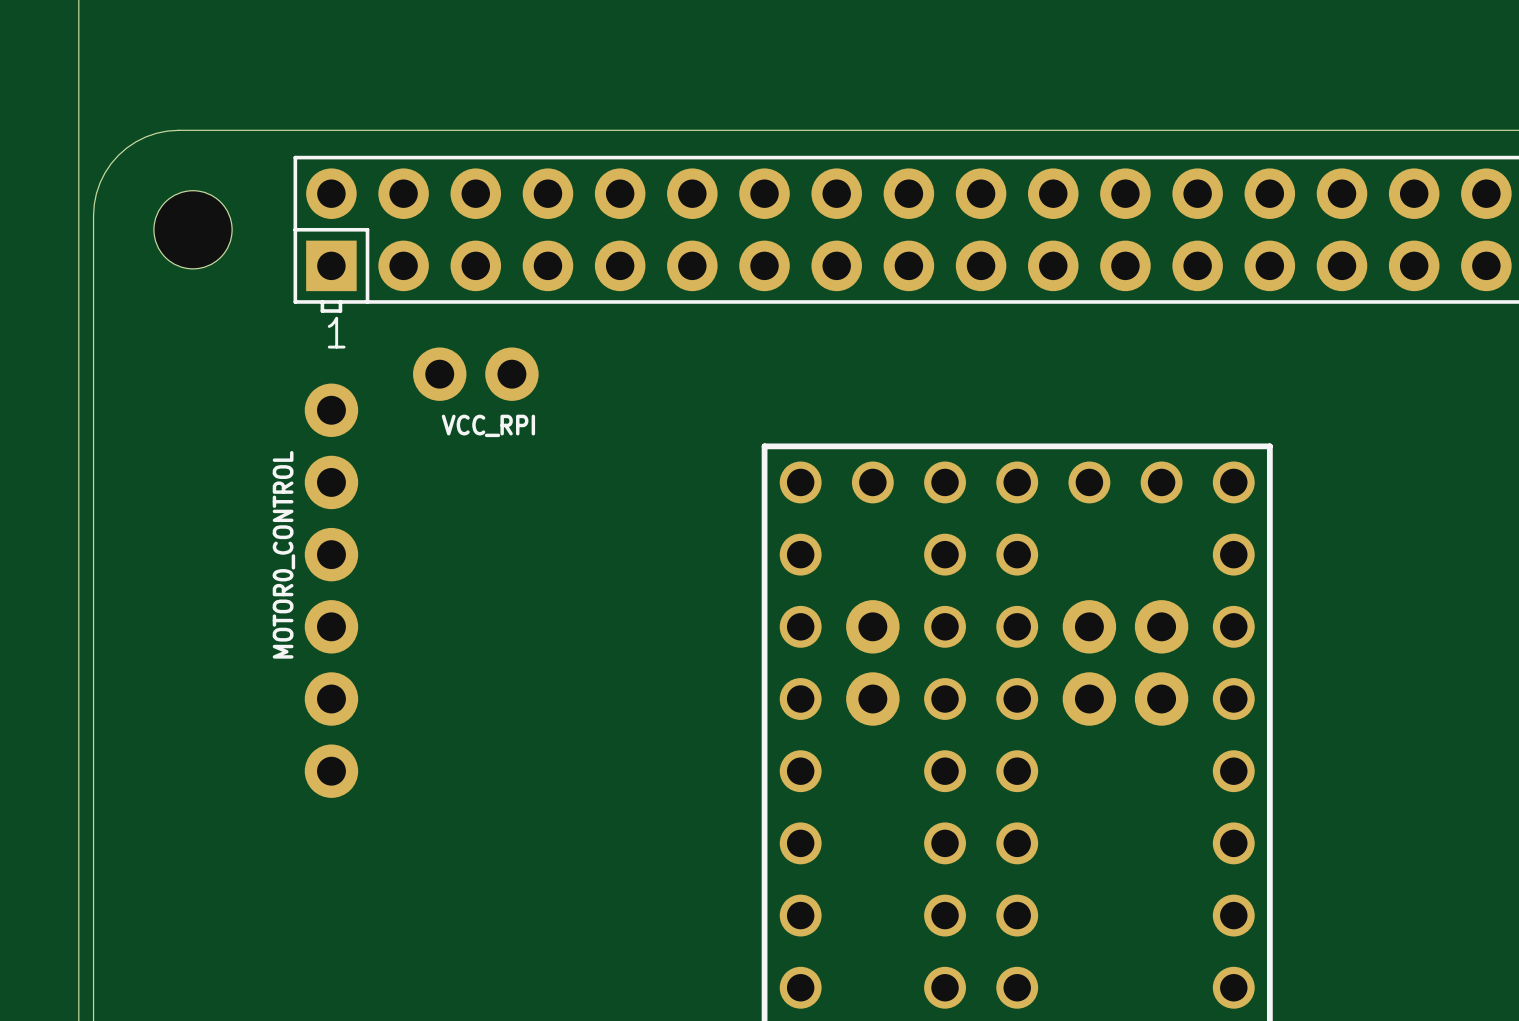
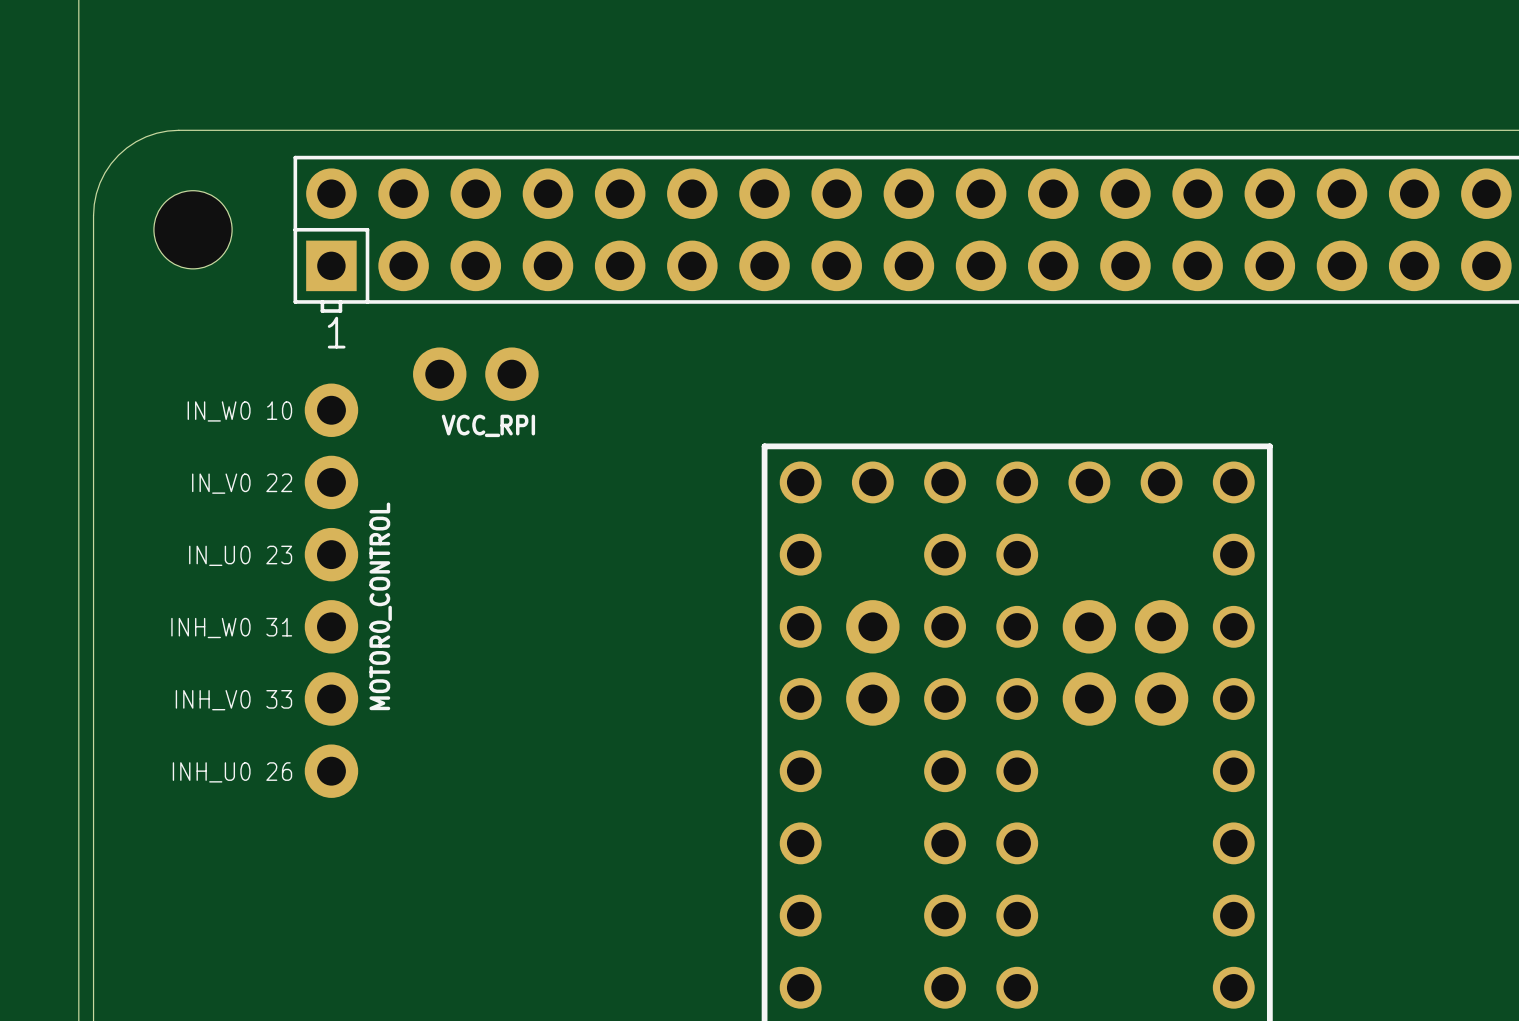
text: none -> IN_W0 10 (239, 411)
text: none -> IN_V0 22 (242, 483)
MOTOR0_CONTROL name position: MOTOR0_CONTROL (283, 554) -> MOTOR0_CONTROL (380, 606)
text: none -> IN_U0 23 (240, 555)
text: none -> INH_W0 31 (231, 628)
text: none -> INH_V0 33 (233, 700)
text: none -> INH_U0 26 (232, 772)

